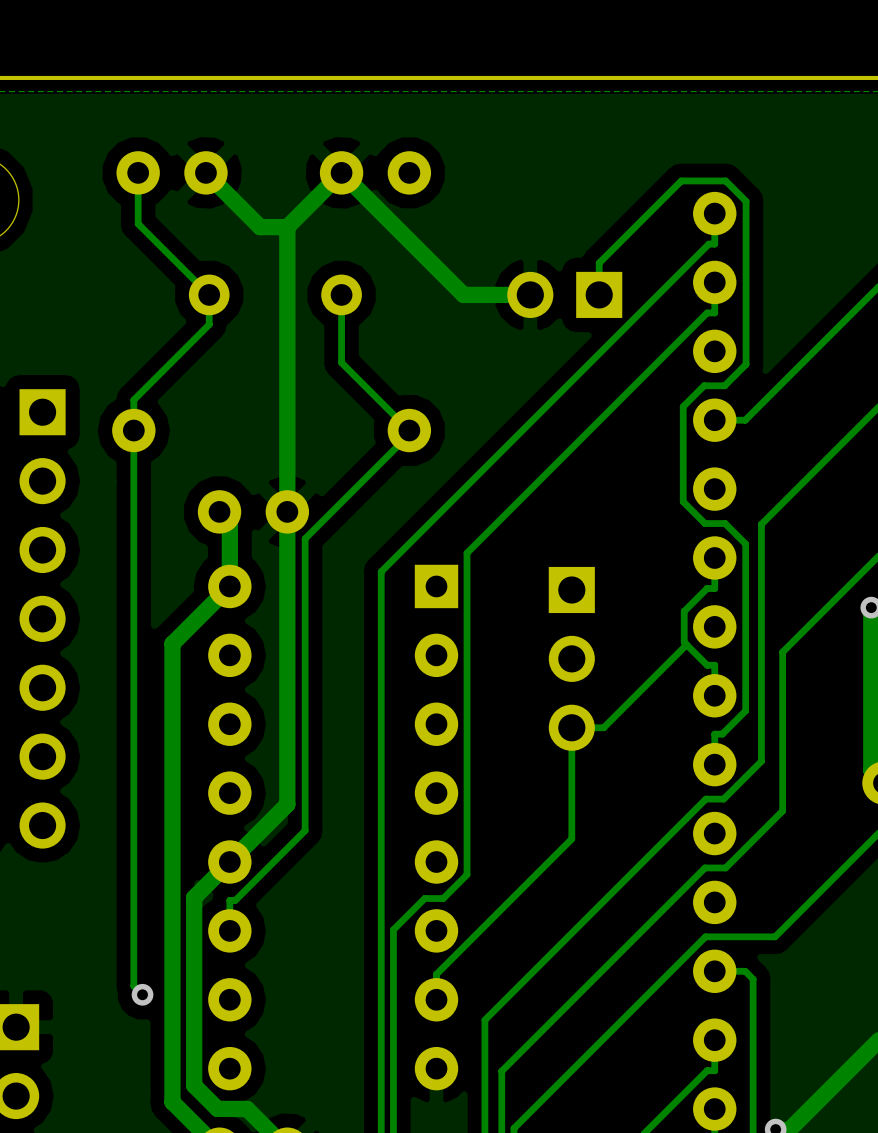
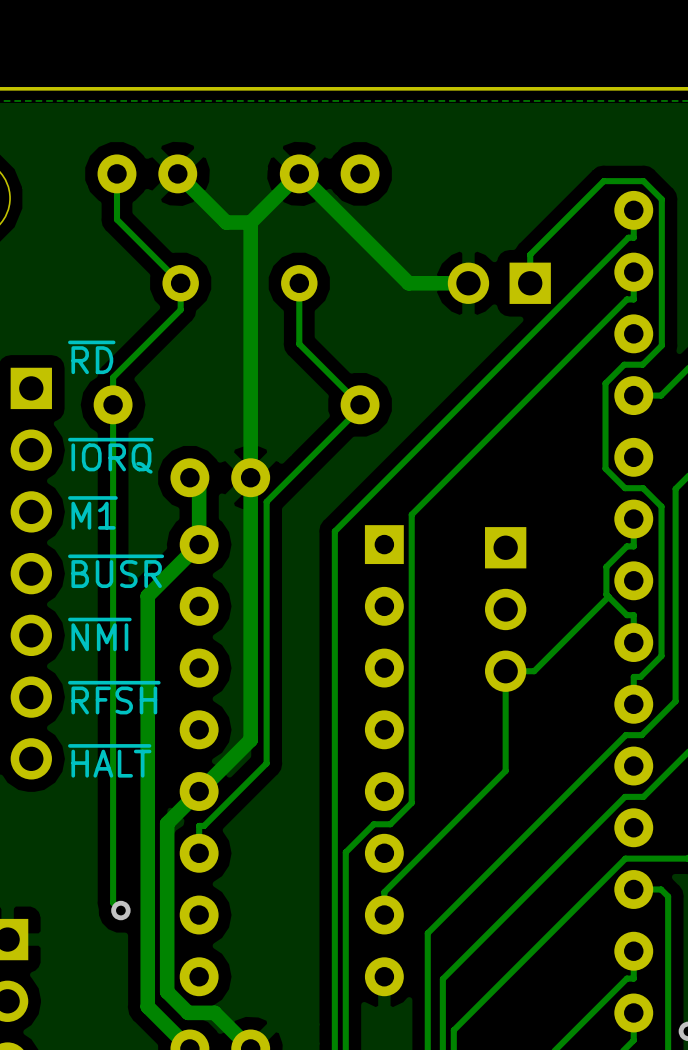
text: none -> ~{RD} (91, 357)
text: none -> ~{IORQ} (110, 455)
text: none -> ~{M1} (92, 512)
text: none -> ~{BUSR} (116, 571)
text: none -> ~{NMI} (99, 634)
text: none -> ~{RFSH} (114, 697)
text: none -> ~{HALT} (109, 760)

